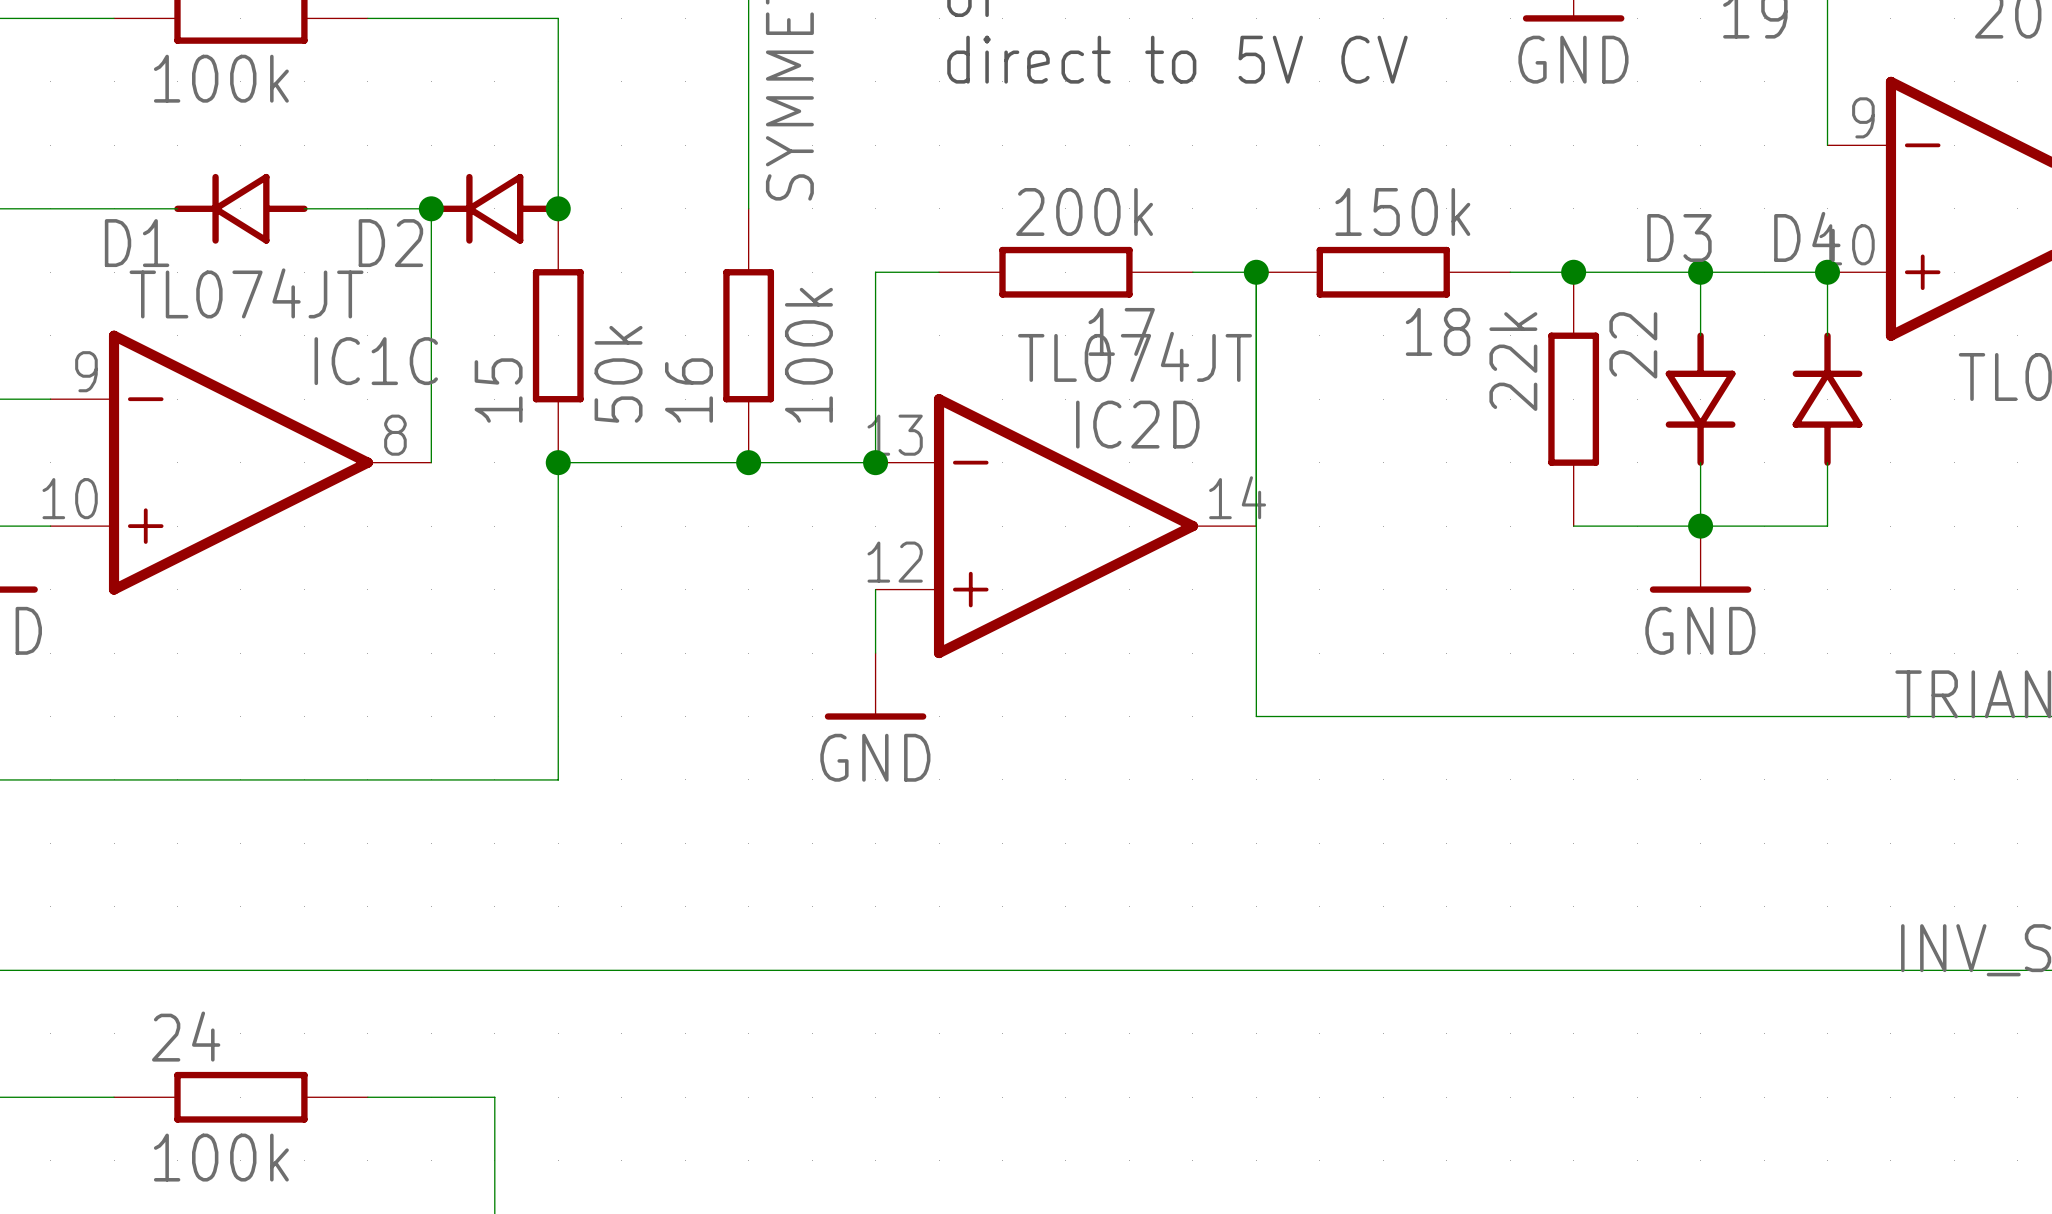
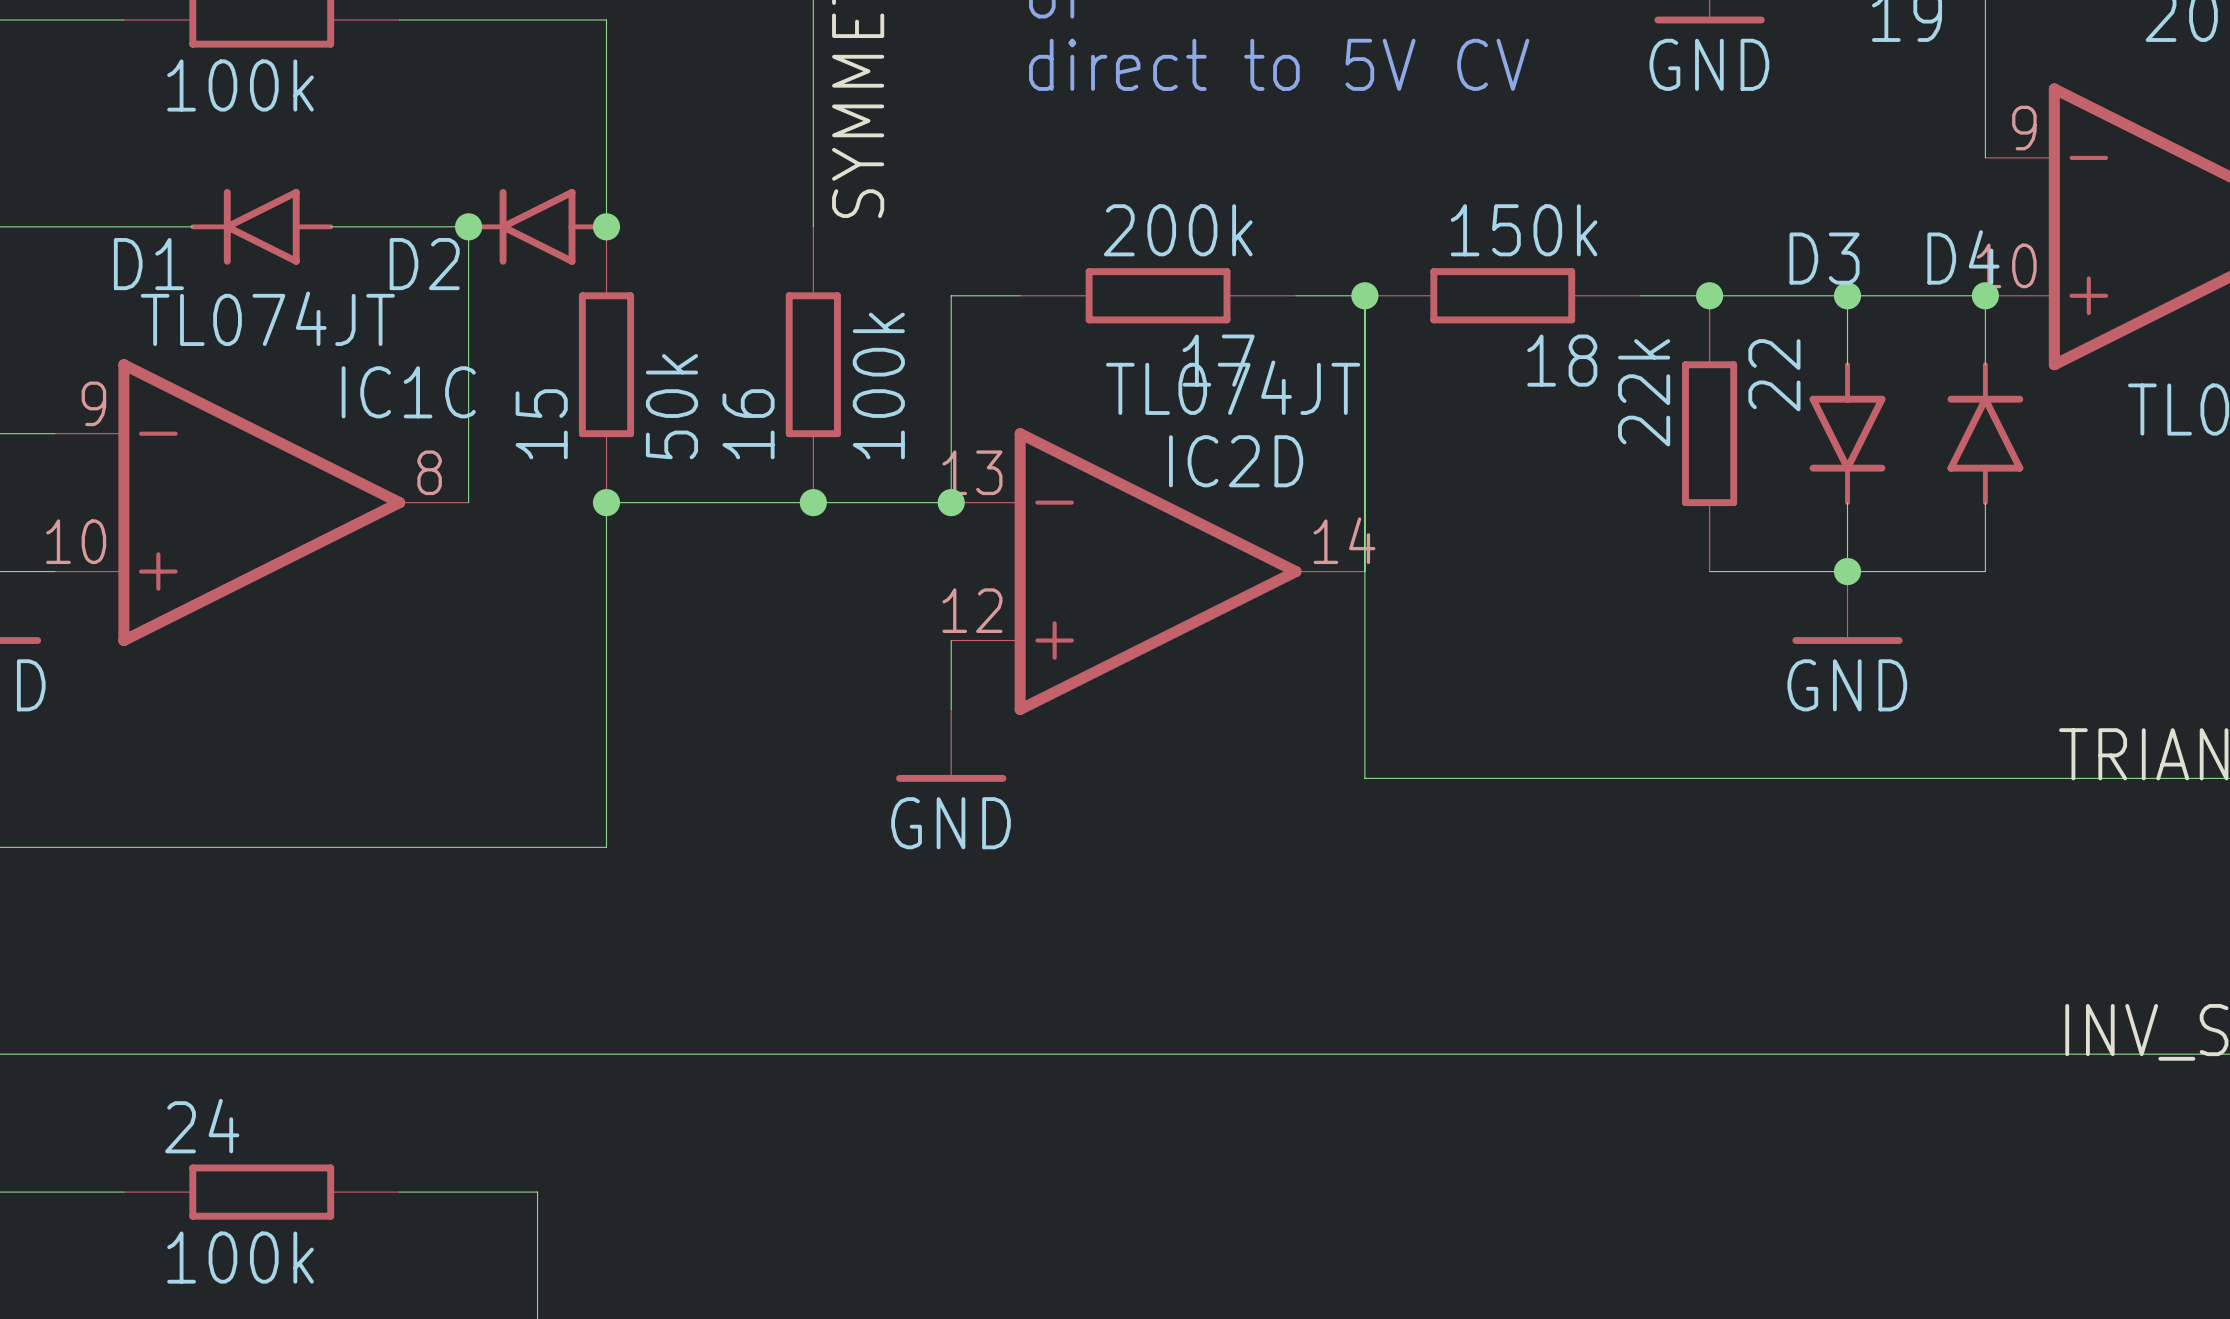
D1 symbol: [174, 173, 308, 244] -> [190, 188, 334, 265]
D2 symbol: [428, 173, 562, 244] -> [466, 188, 609, 265]
D3 symbol: [1665, 332, 1736, 466] -> [1809, 362, 1886, 506]
D4 symbol: [1792, 332, 1863, 466] -> [1947, 362, 2024, 506]

